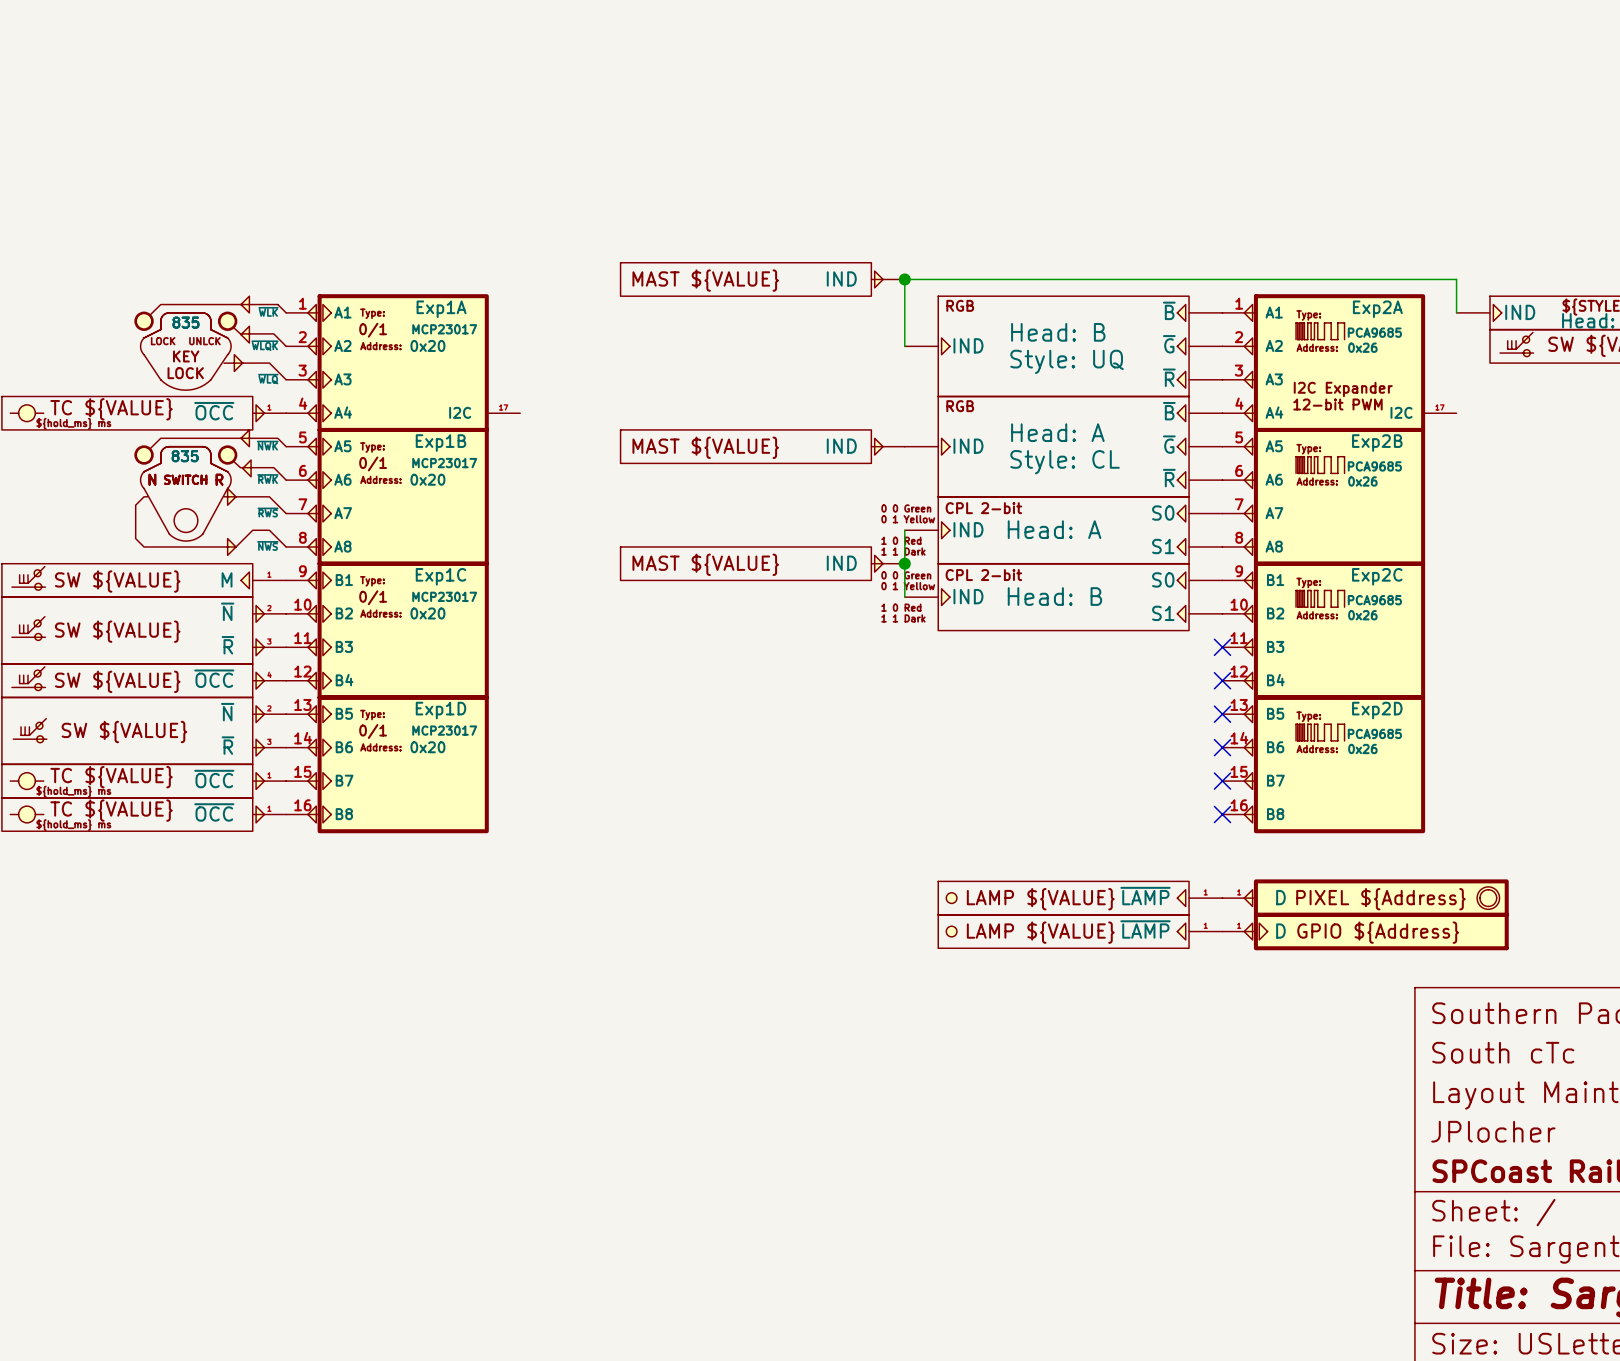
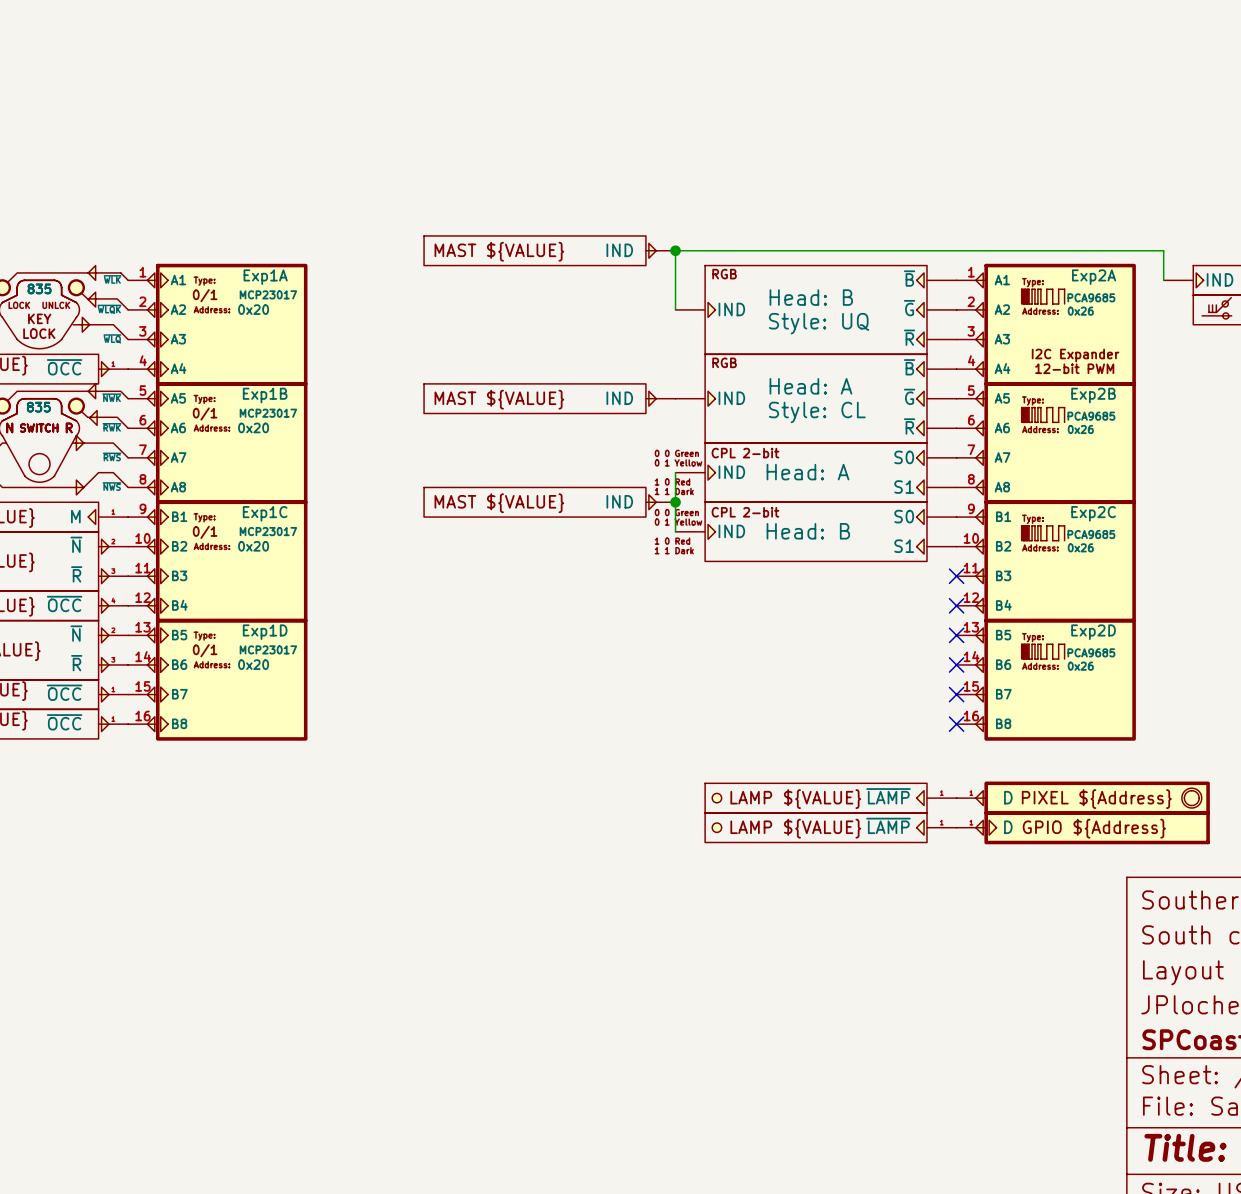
Exp1A symbol: [286, 294, 521, 432] -> [128, 263, 308, 386]
Exp2A symbol: [1222, 294, 1457, 432] -> [956, 263, 1136, 386]

